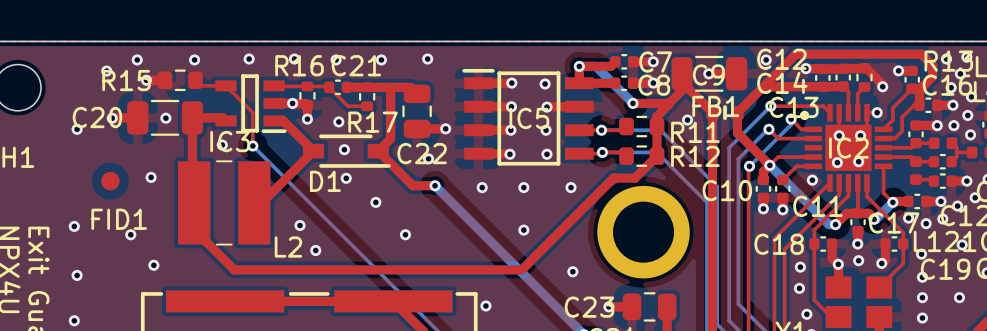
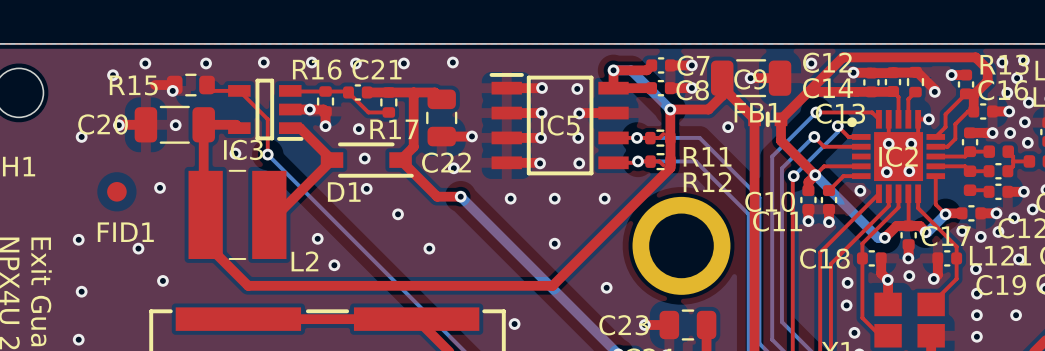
via position: (146, 80) -> (172, 90)
top track: none -> (670, 109) (670, 138)
top track: (669, 103) (657, 116) (657, 156) (635, 178) (613, 178) -> (670, 138) (670, 167) (649, 188)
R11 footprint: [619, 115, 665, 138] -> [645, 129, 676, 147]
R12 footprint: [619, 145, 665, 167] -> [645, 153, 676, 171]
C11 name position: C11 (817, 206) -> C11 (777, 221)

